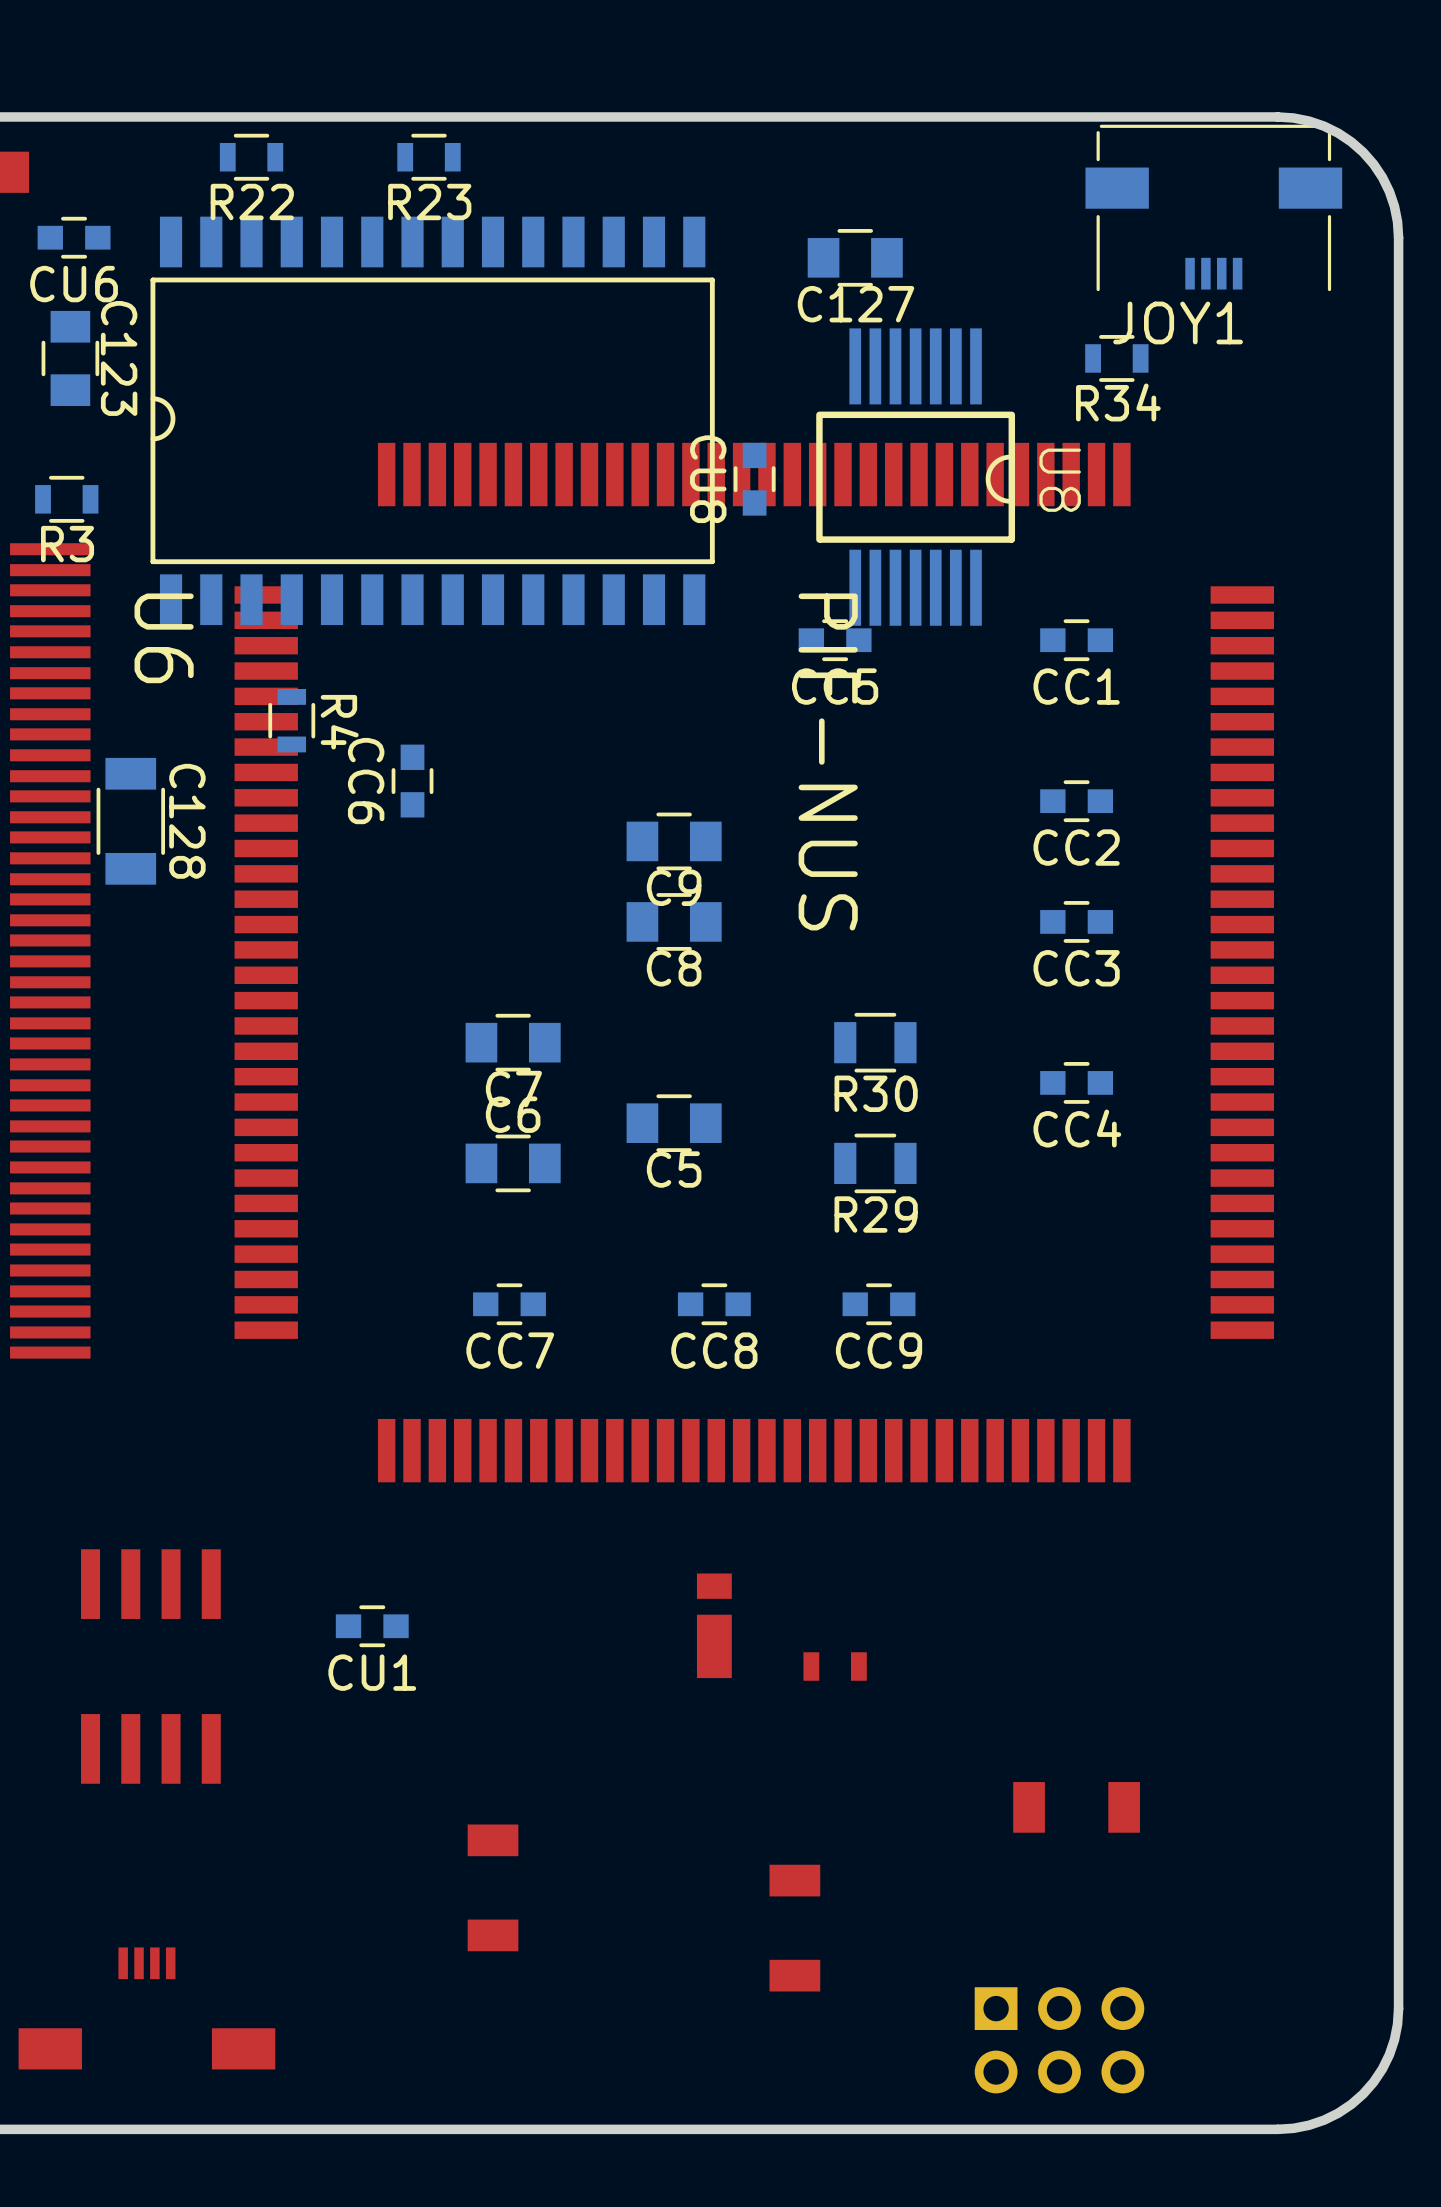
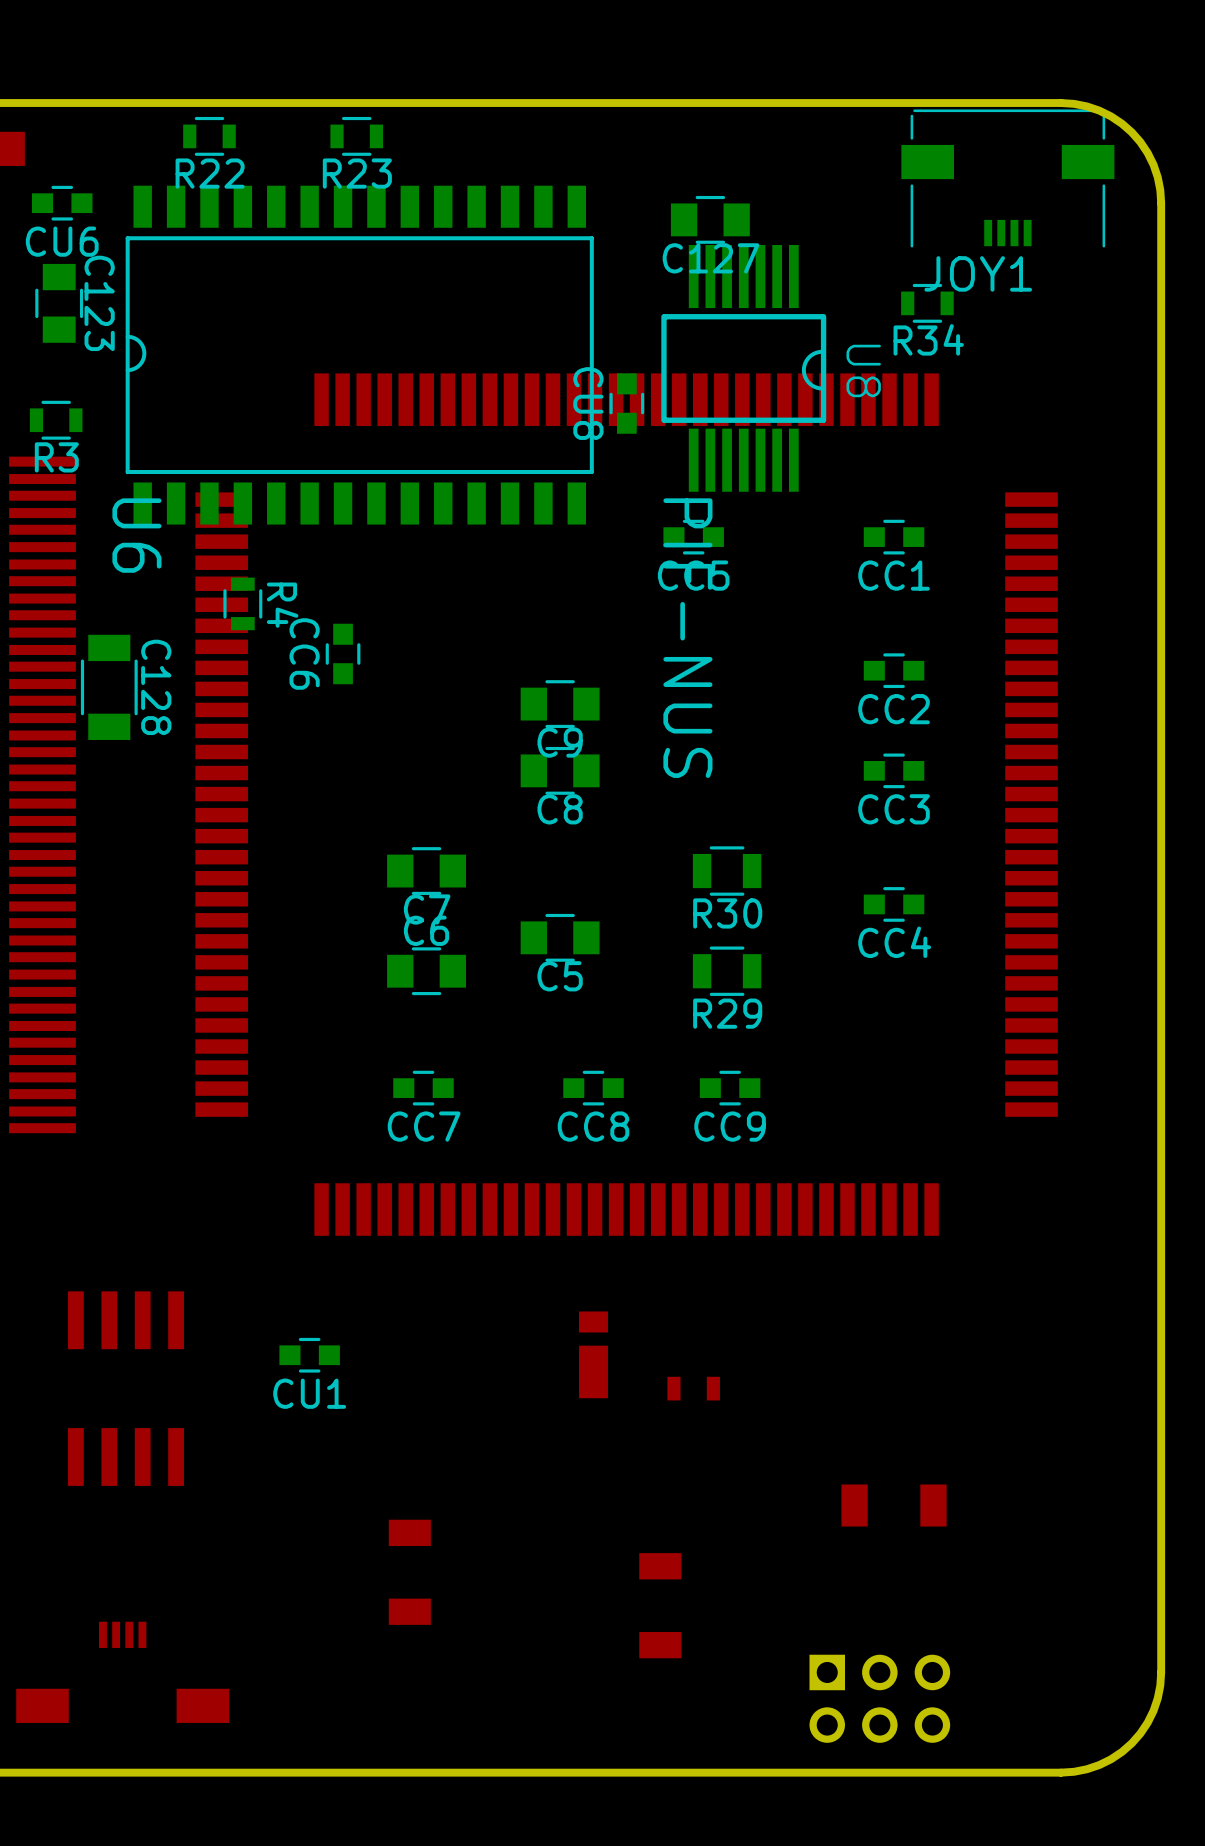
U8 position: (915, 477) -> (743, 368)

